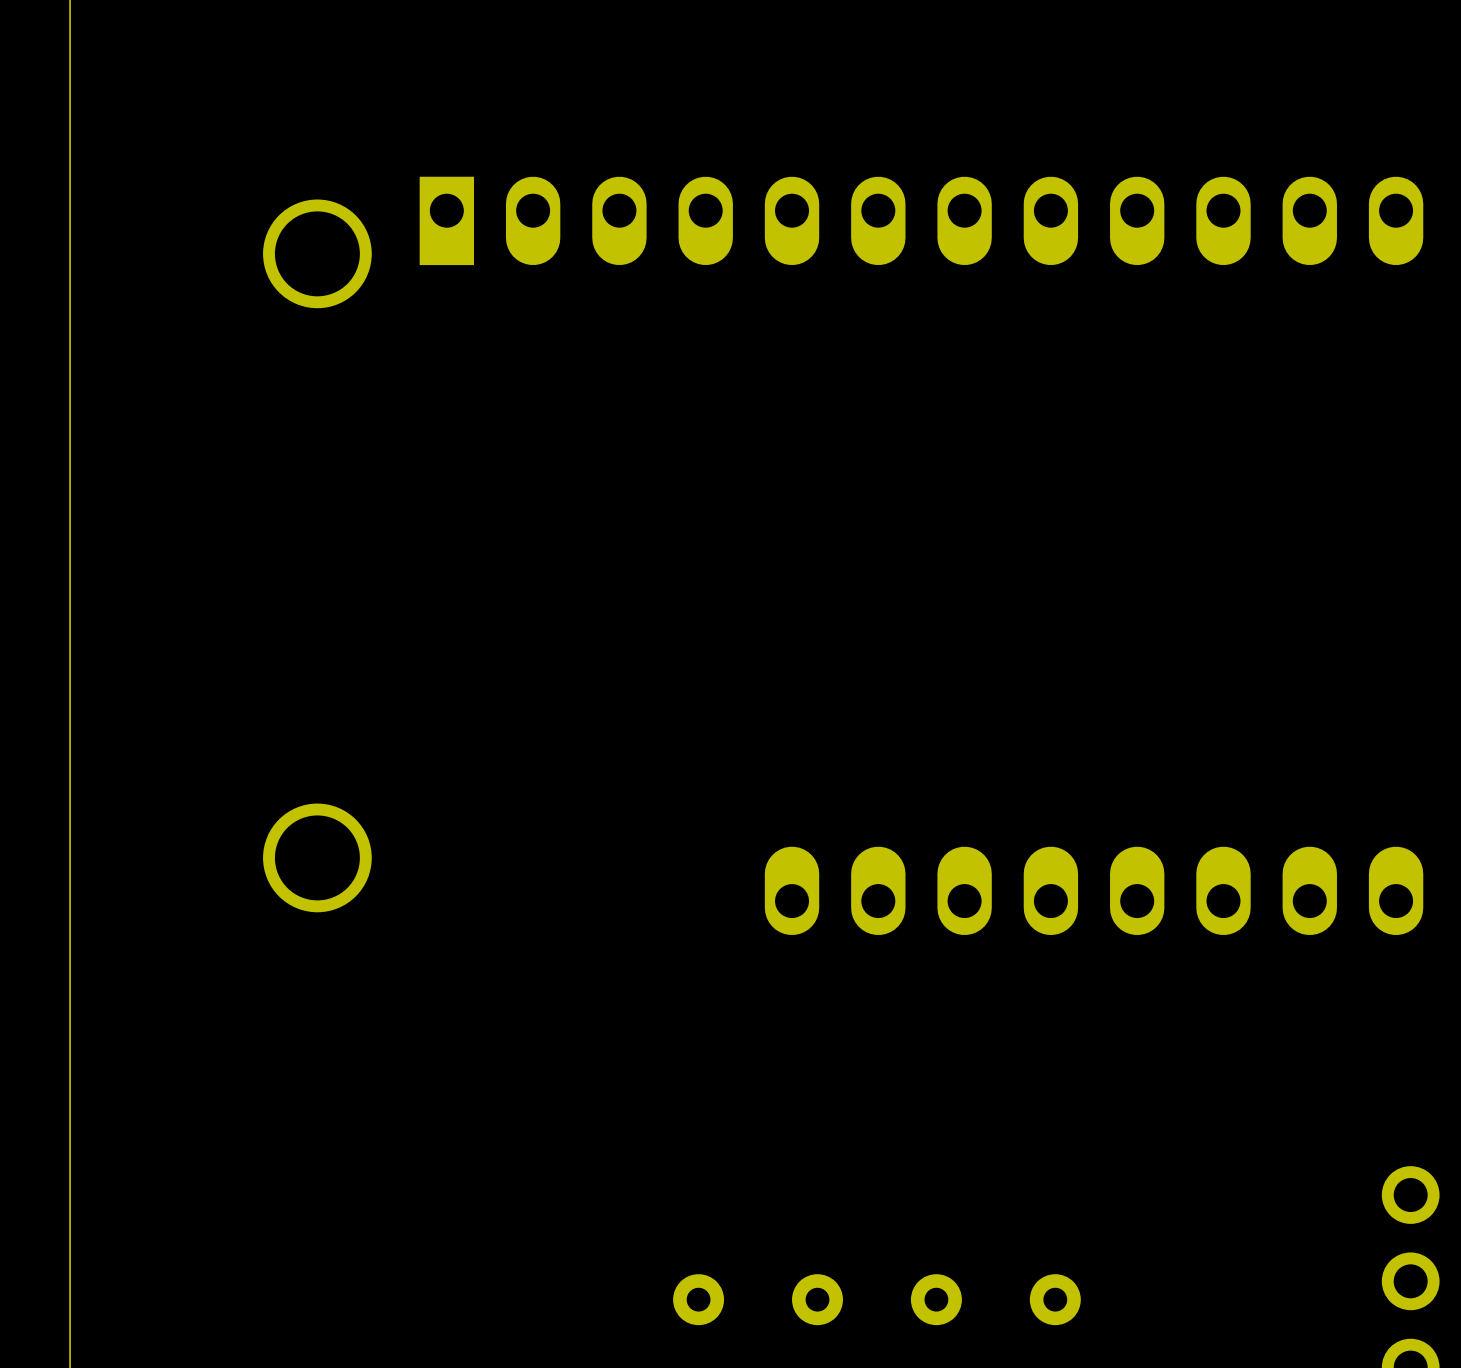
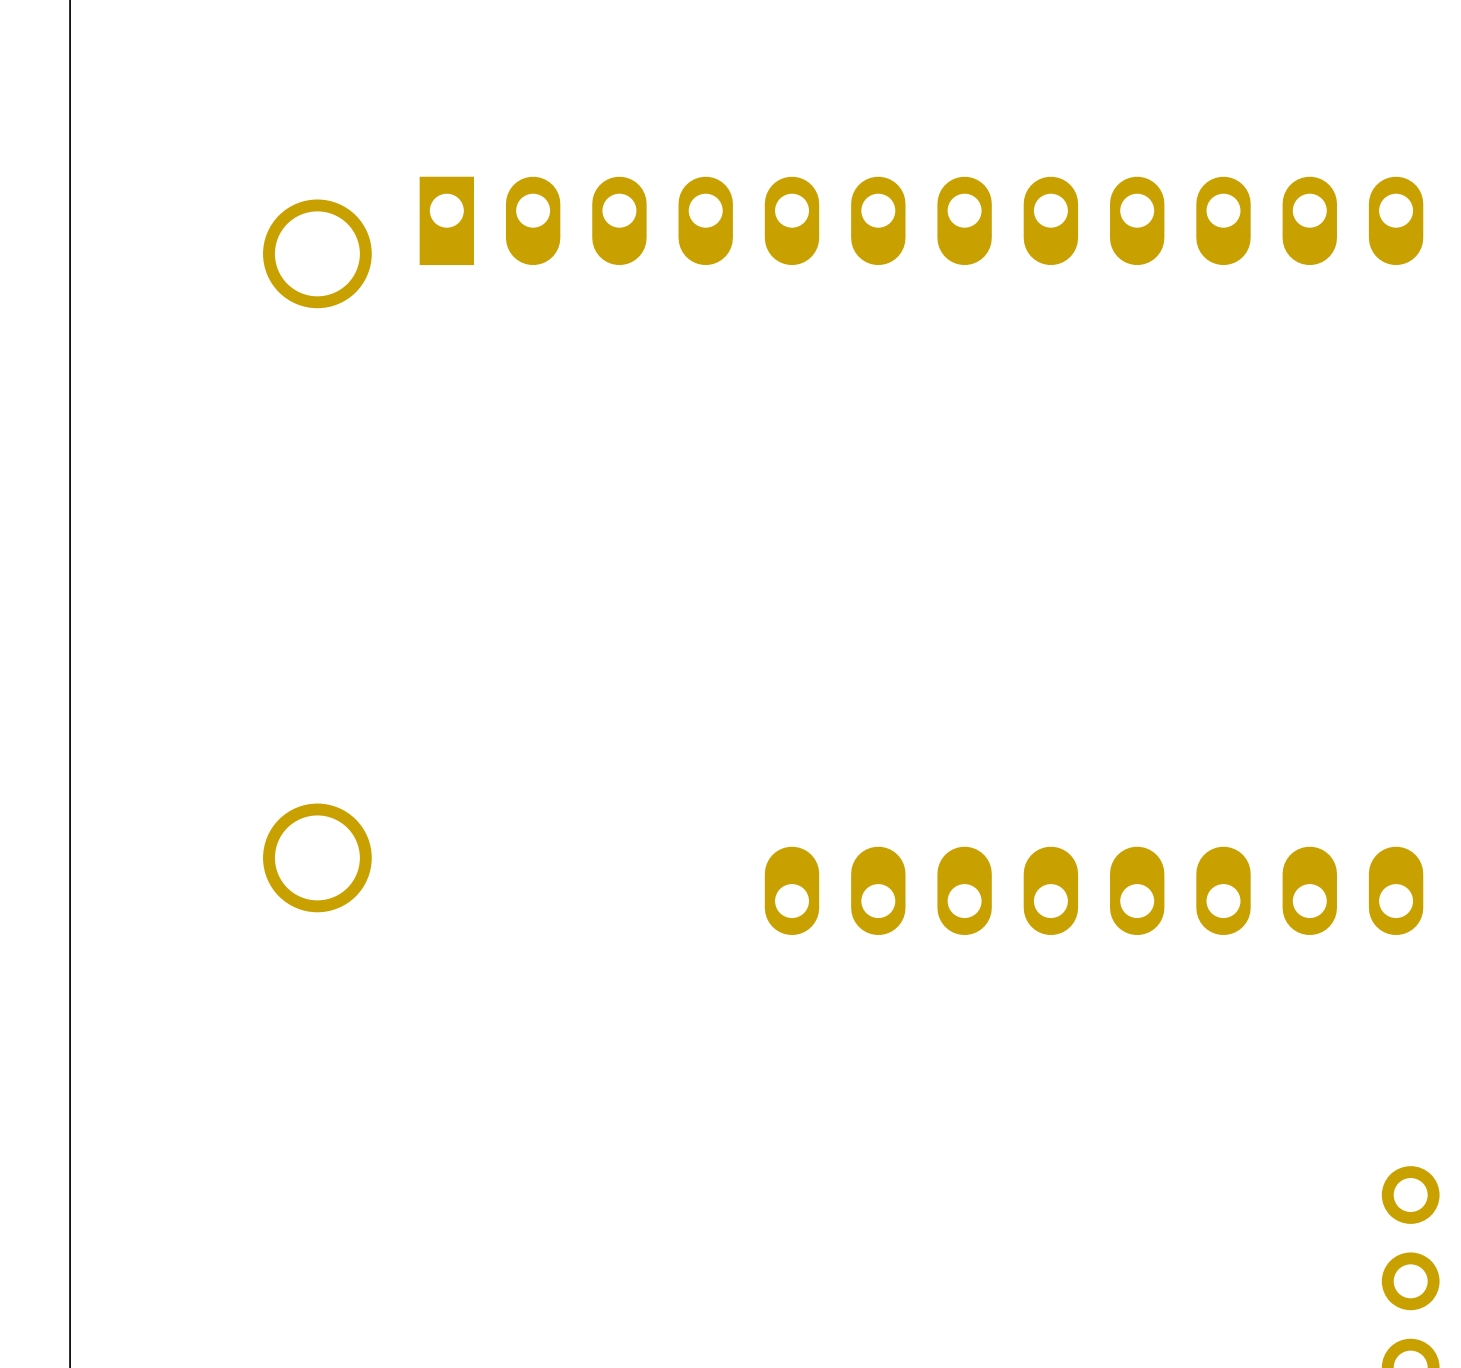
part: (698, 1299) -> none
part: (817, 1299) -> none
part: (936, 1299) -> none
part: (1055, 1299) -> none

